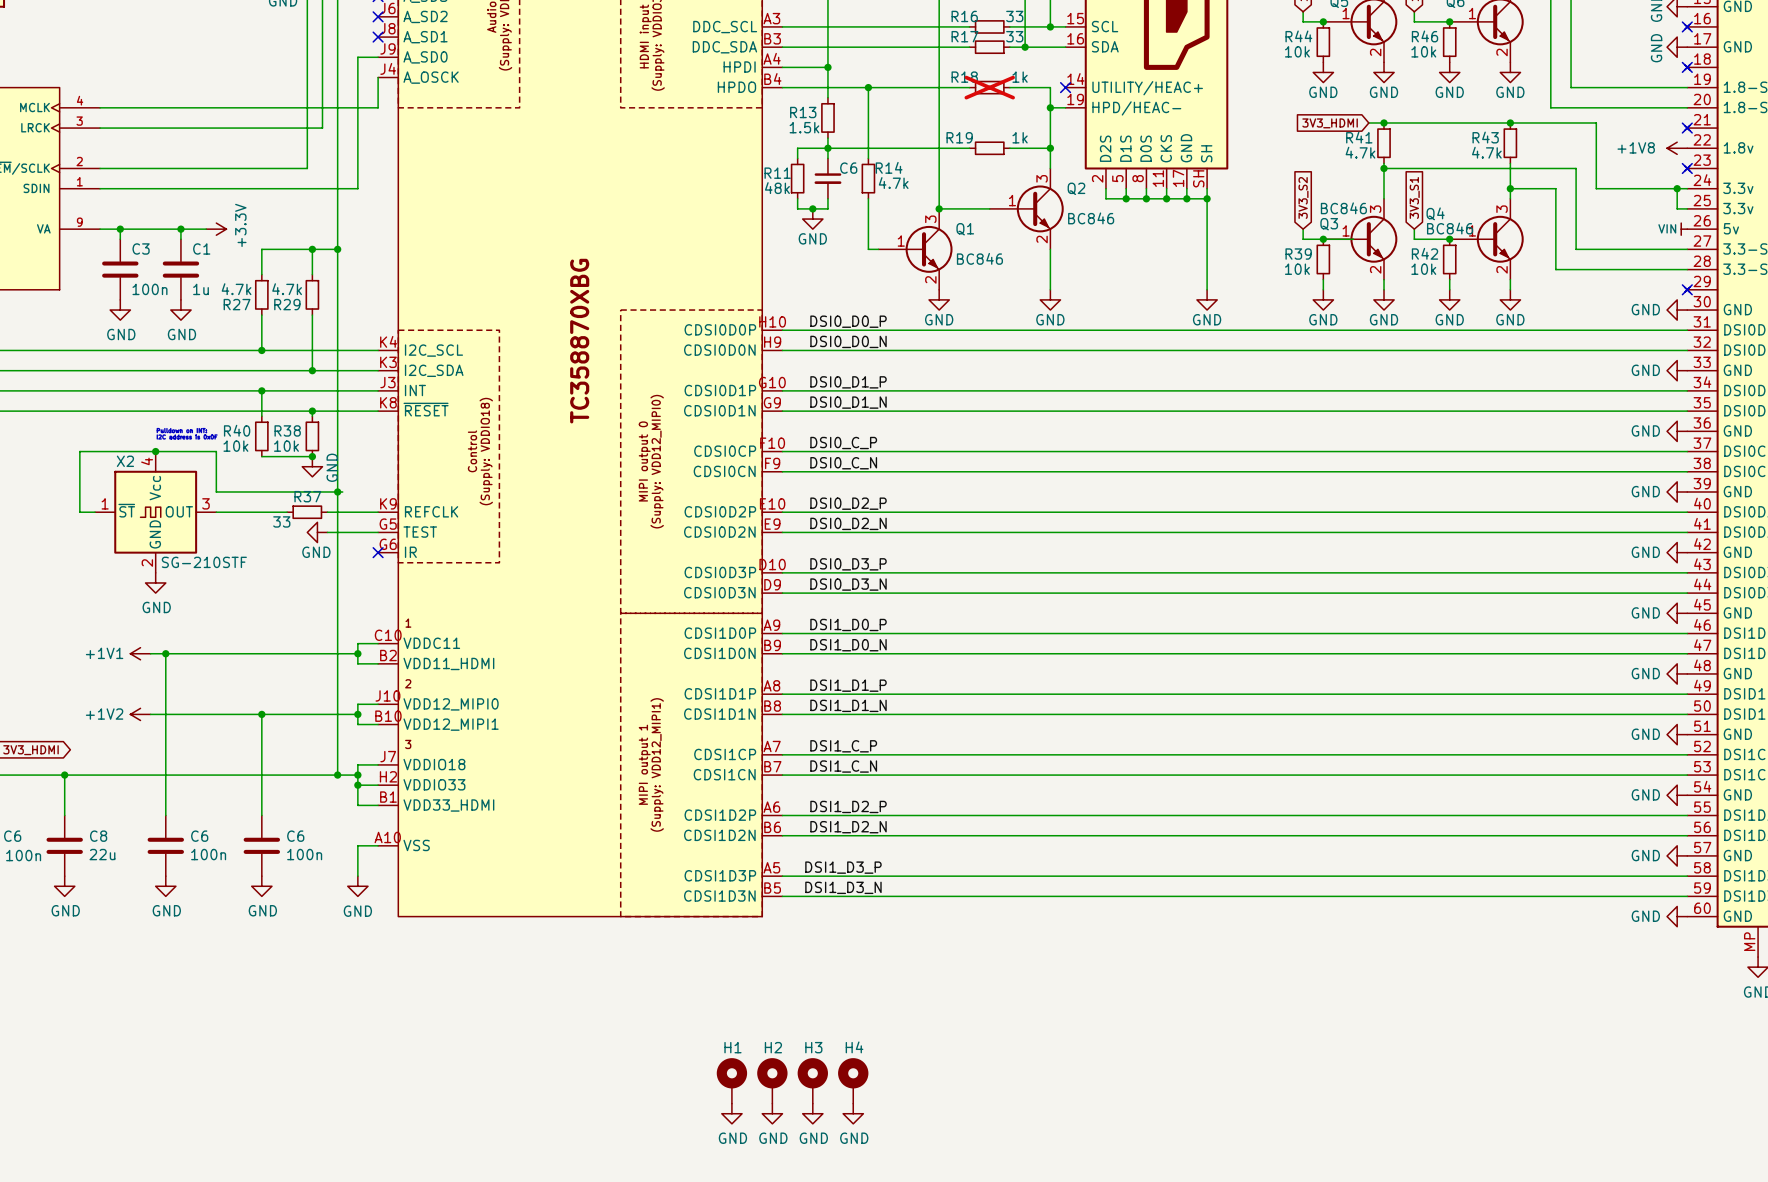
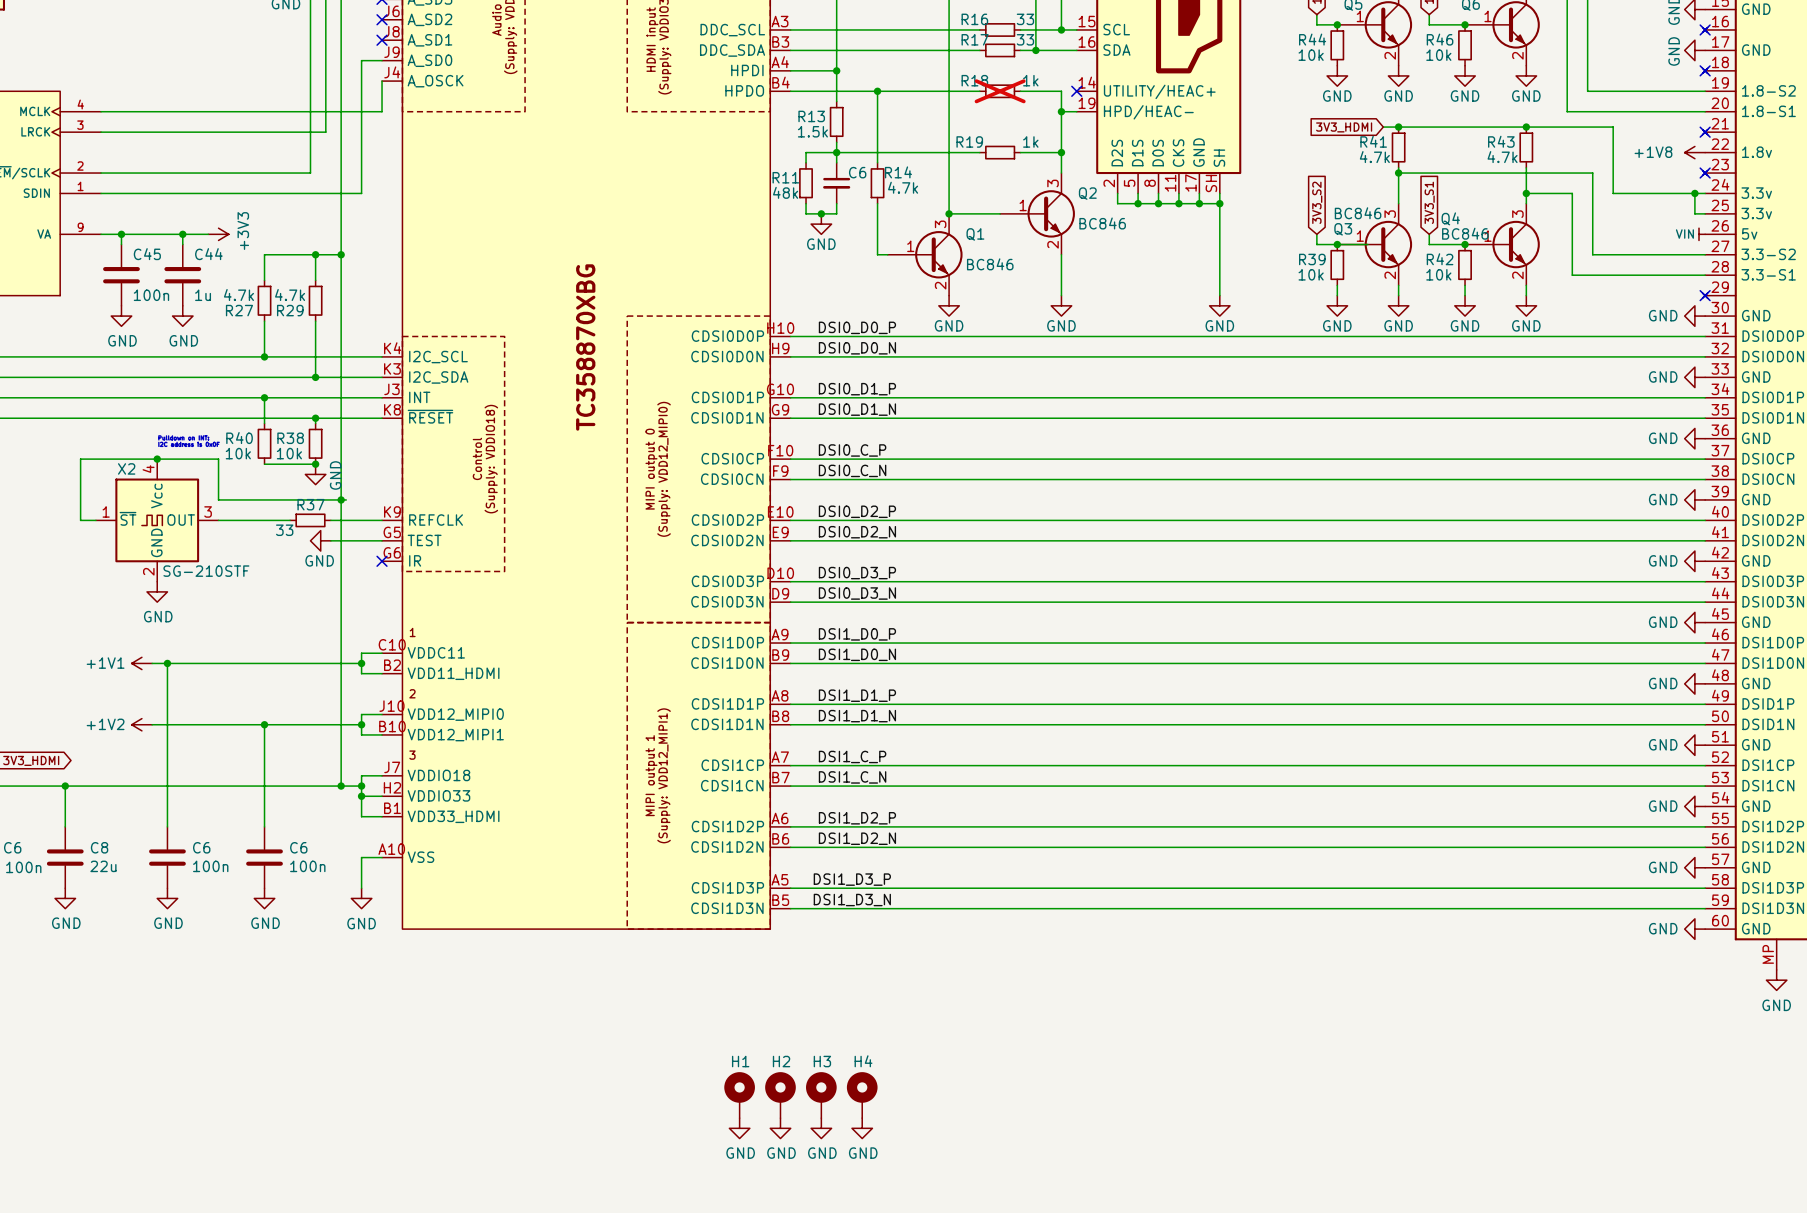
power symbol: +3.3V (216, 229) -> +3V3 (218, 234)
C3 name: C3 (141, 248) -> C45 (147, 254)
C1 name: C1 (201, 248) -> C44 (208, 254)

